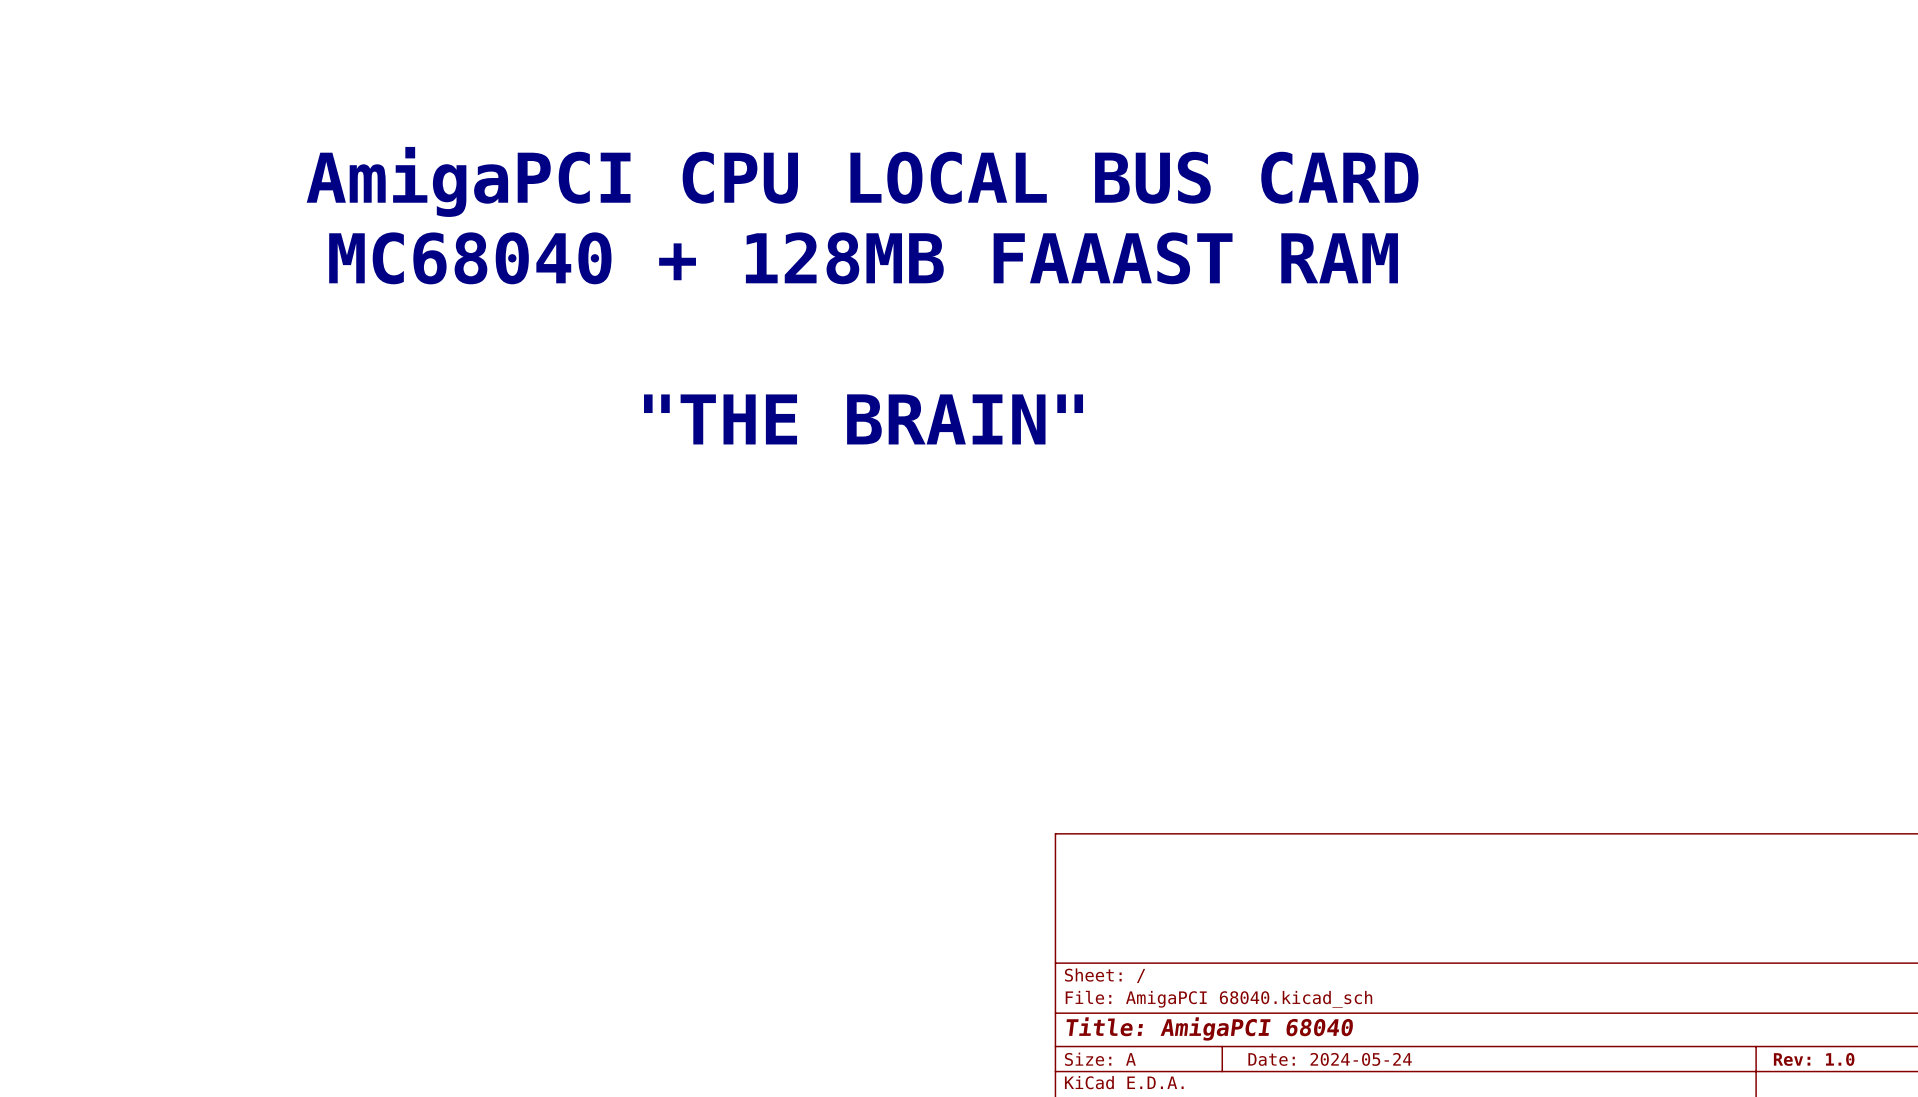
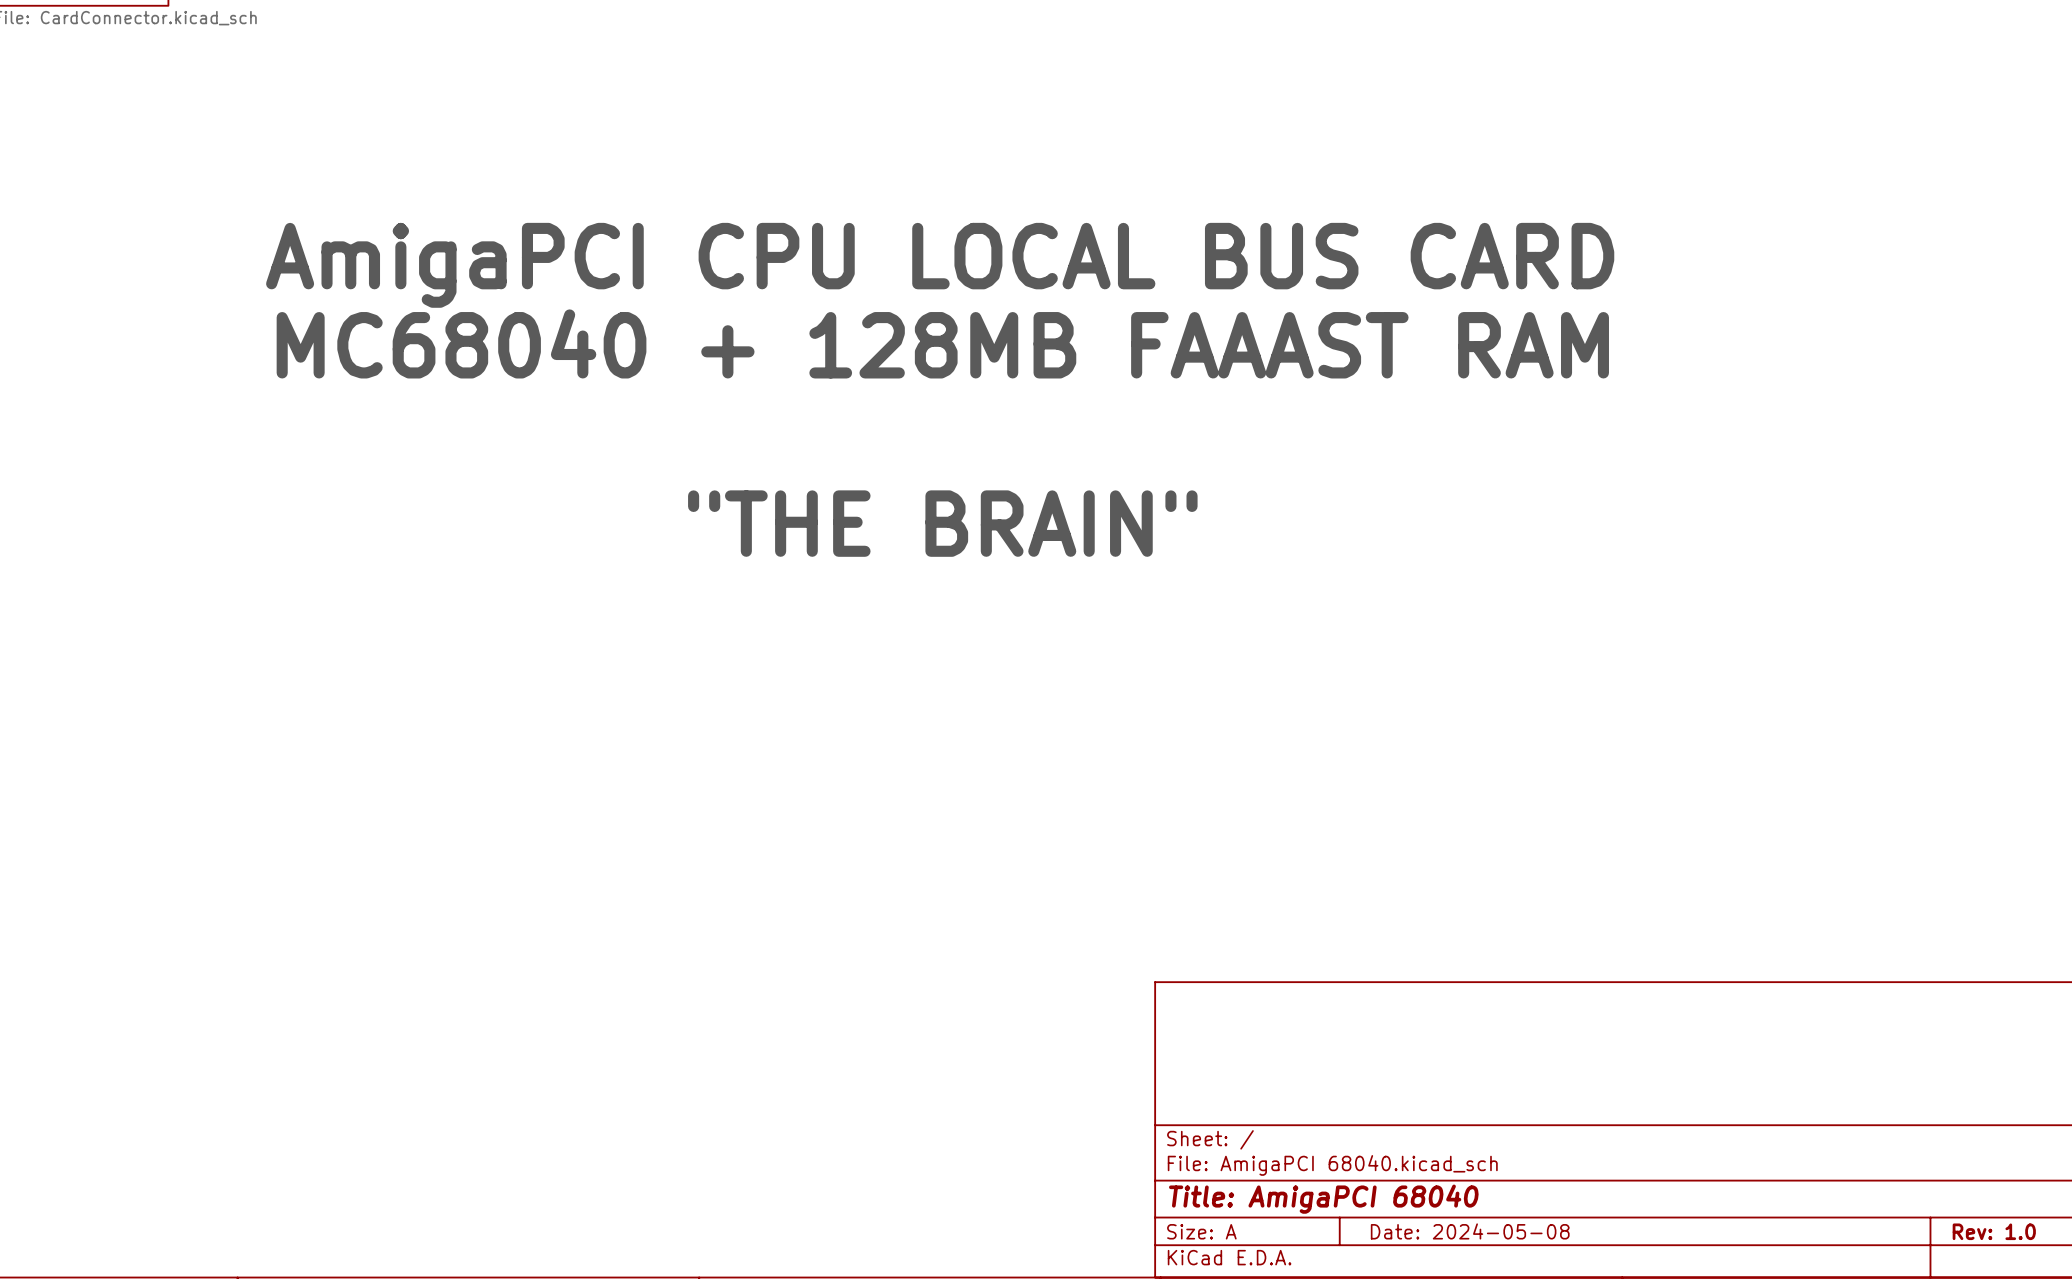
title block: Date: 2024-05-24 (1330, 1059) -> Date: 2024-05-08 (1470, 1231)

